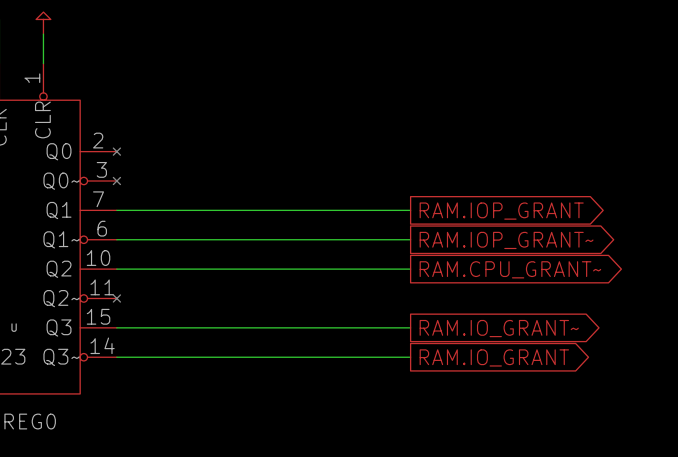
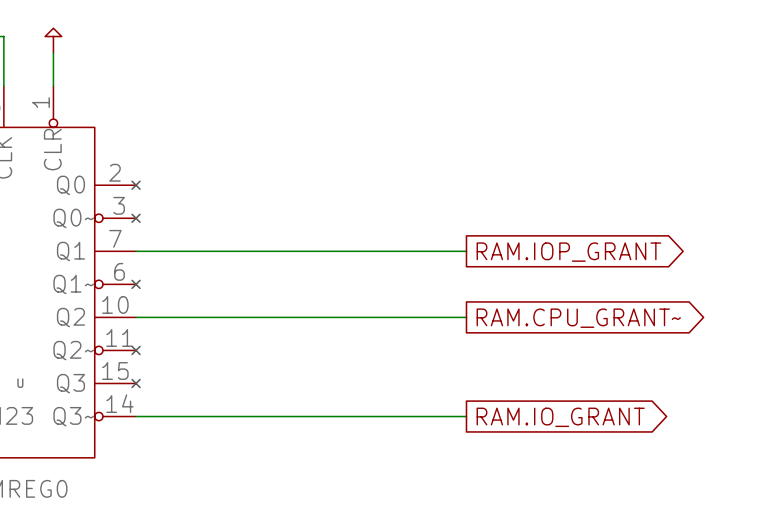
wire: (116, 239) (410, 239) -> none
no-connect mark: none -> (136, 284)
global label: RAM.IOP_GRANT~ (506, 240) -> none
wire: (116, 327) (410, 327) -> none
no-connect mark: none -> (136, 383)
global label: RAM.IO_GRANT~ (499, 328) -> none

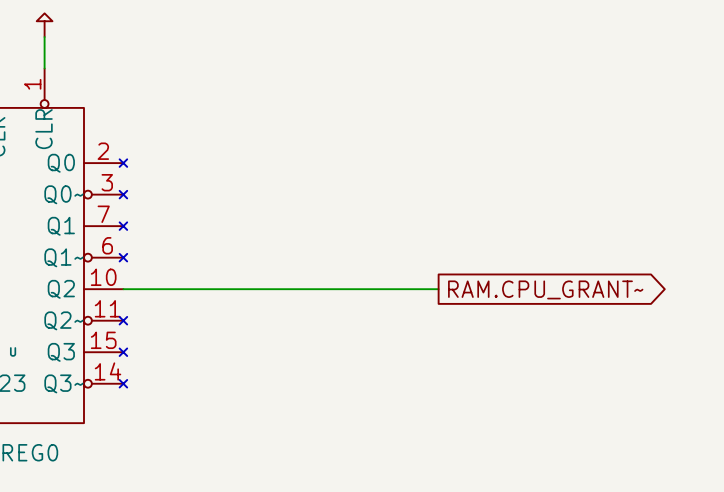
wire: (136, 251) (466, 251) -> none
no-connect mark: none -> (123, 226)
global label: RAM.IOP_GRANT (568, 252) -> none
wire: (136, 416) (466, 416) -> none
no-connect mark: none -> (123, 383)
global label: RAM.IO_GRANT (560, 417) -> none

